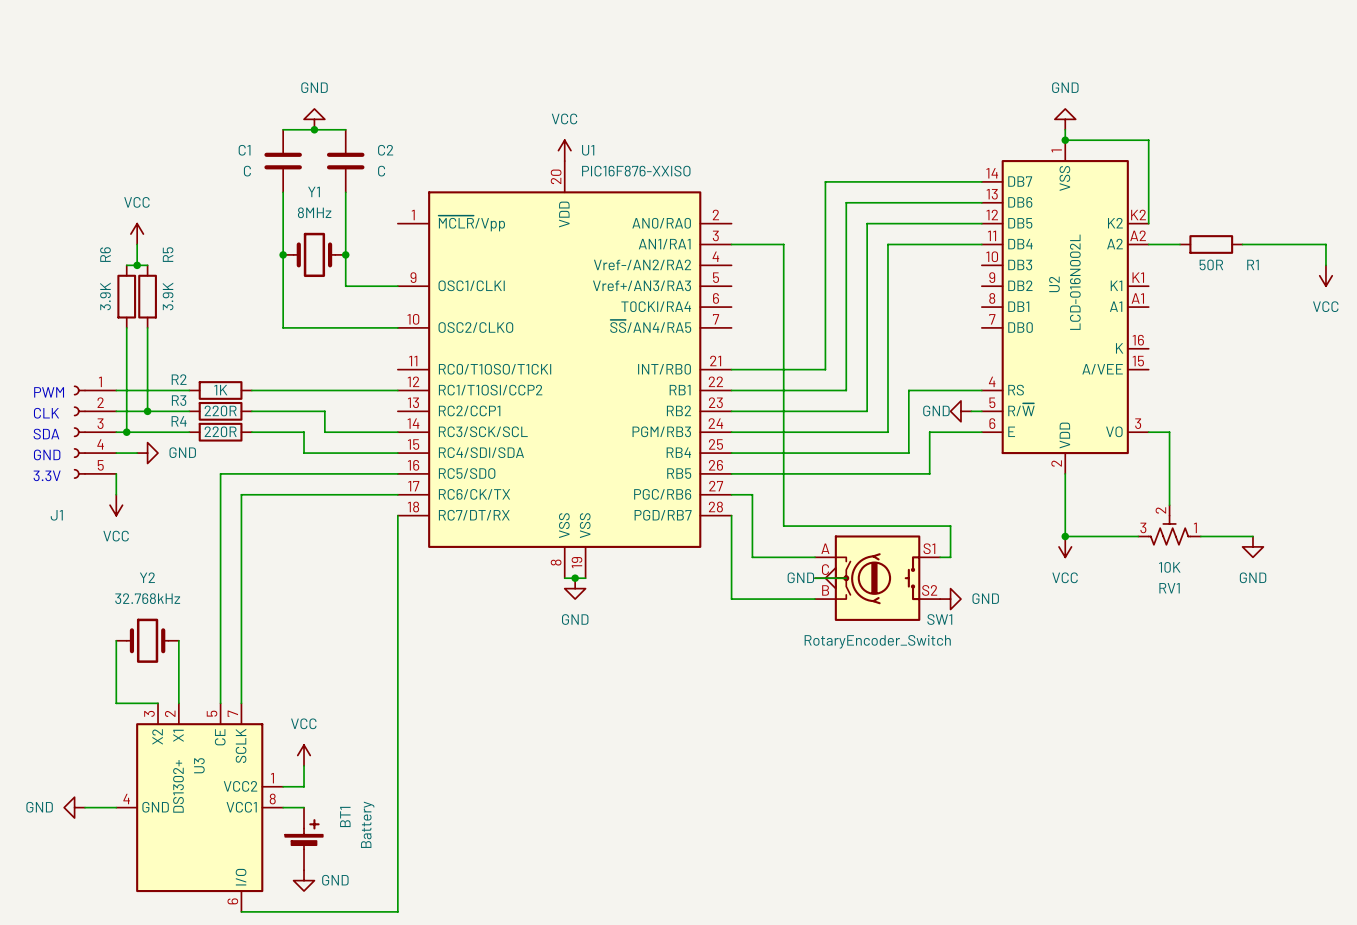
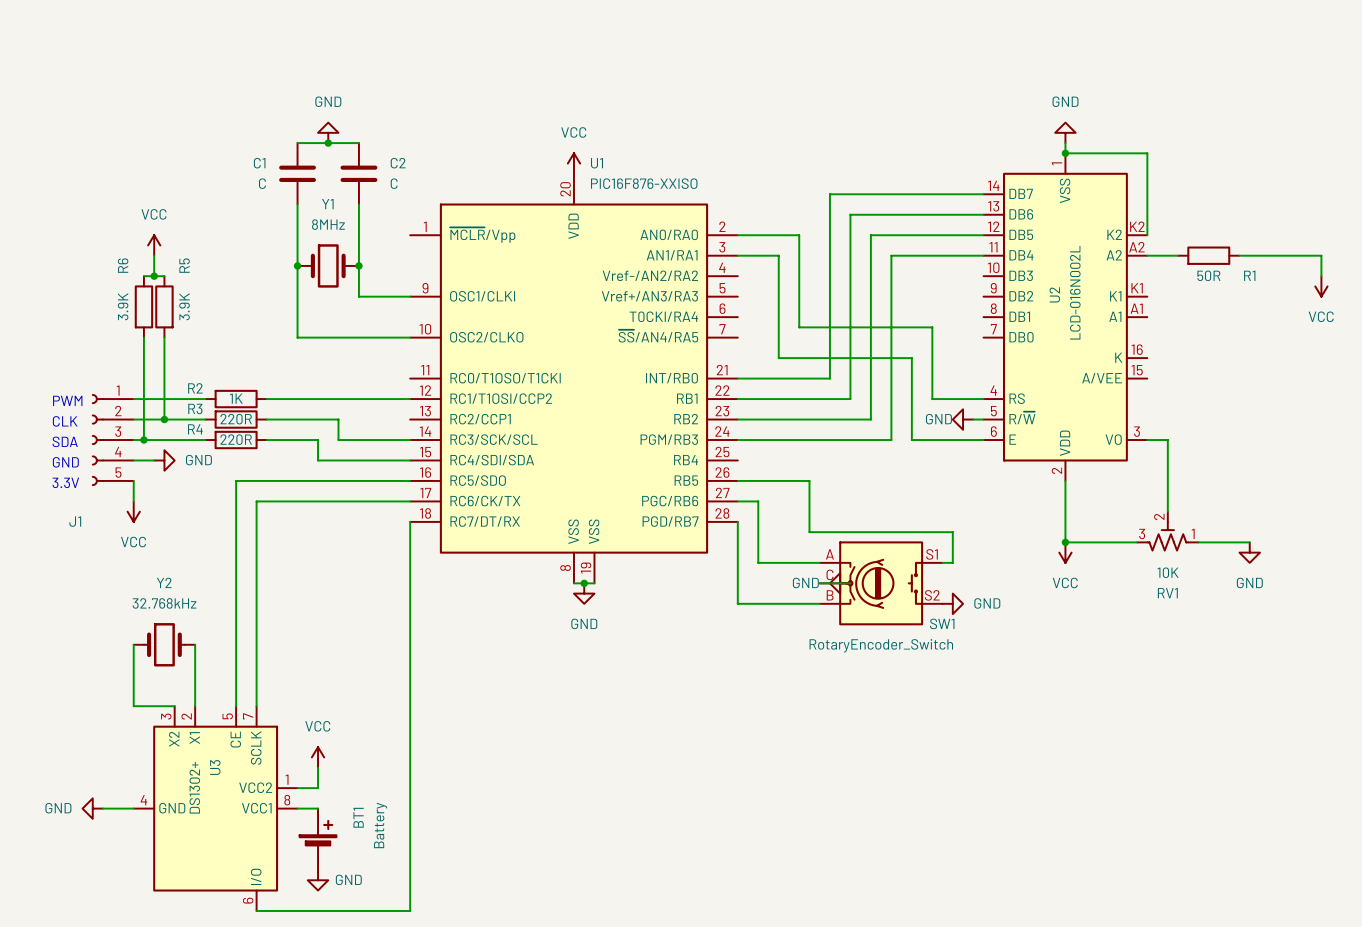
wire: (773, 244) (783, 244) (783, 526) (804, 526) -> (778, 255) (778, 358) (911, 358) (911, 399)
wire: (908, 390) (929, 390) -> (737, 235) (799, 235) (799, 327) (932, 327) (932, 399)
wire: (908, 432) (908, 453) (731, 453) -> none
wire: (929, 432) (929, 473) (804, 473) -> (932, 440) (911, 440)
wire: none -> (809, 480) (809, 532)

